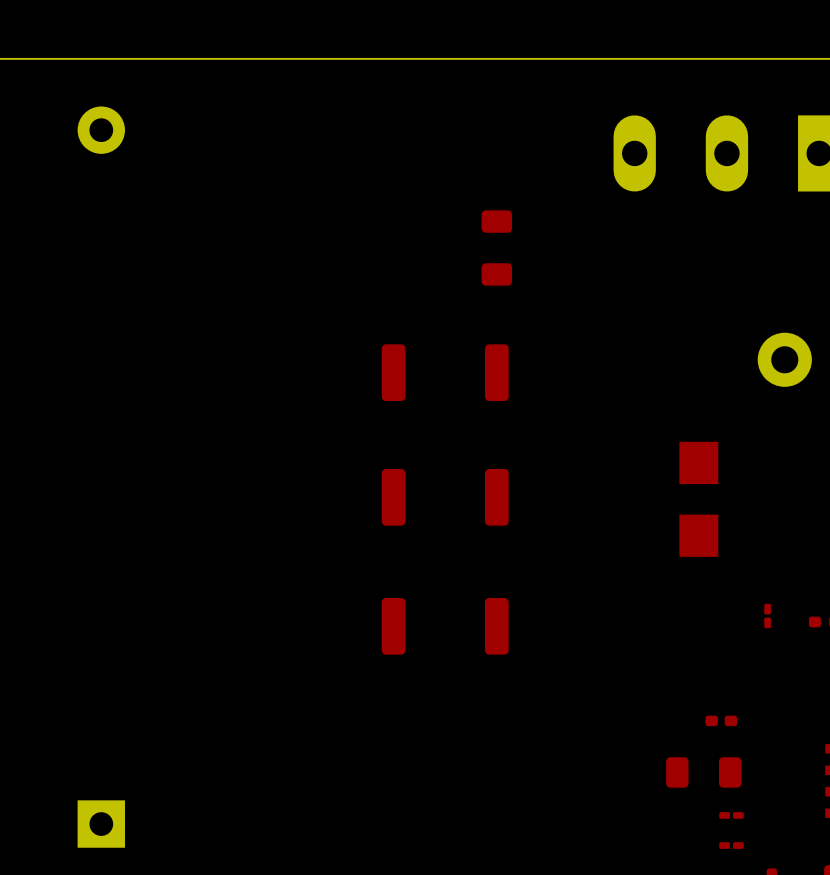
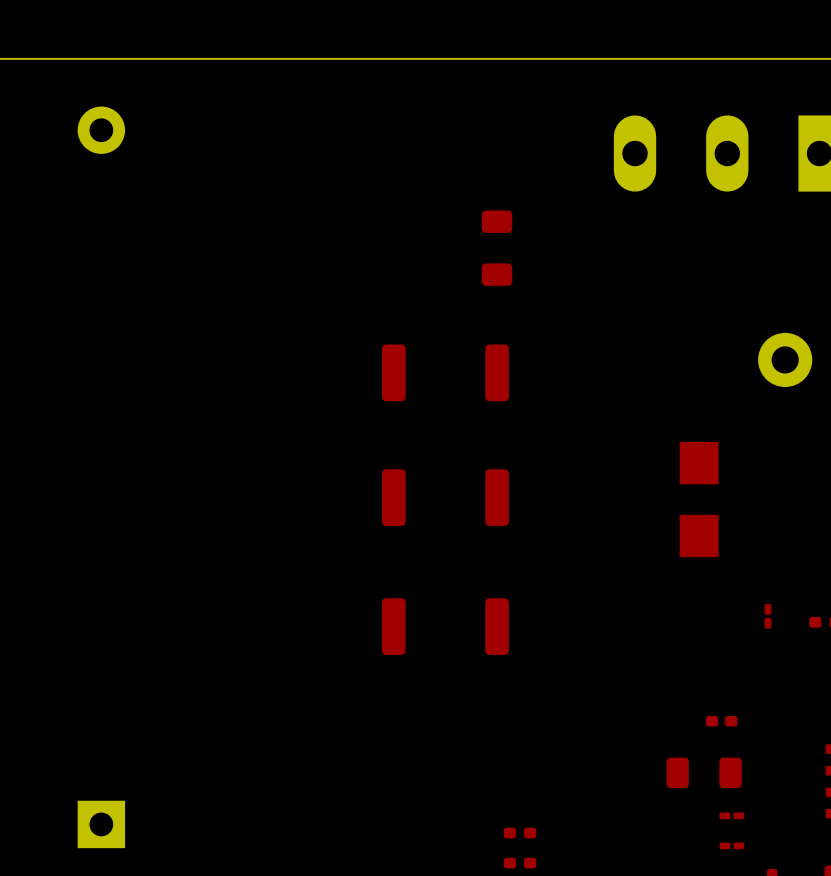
part: none -> (520, 833)
part: none -> (520, 863)

